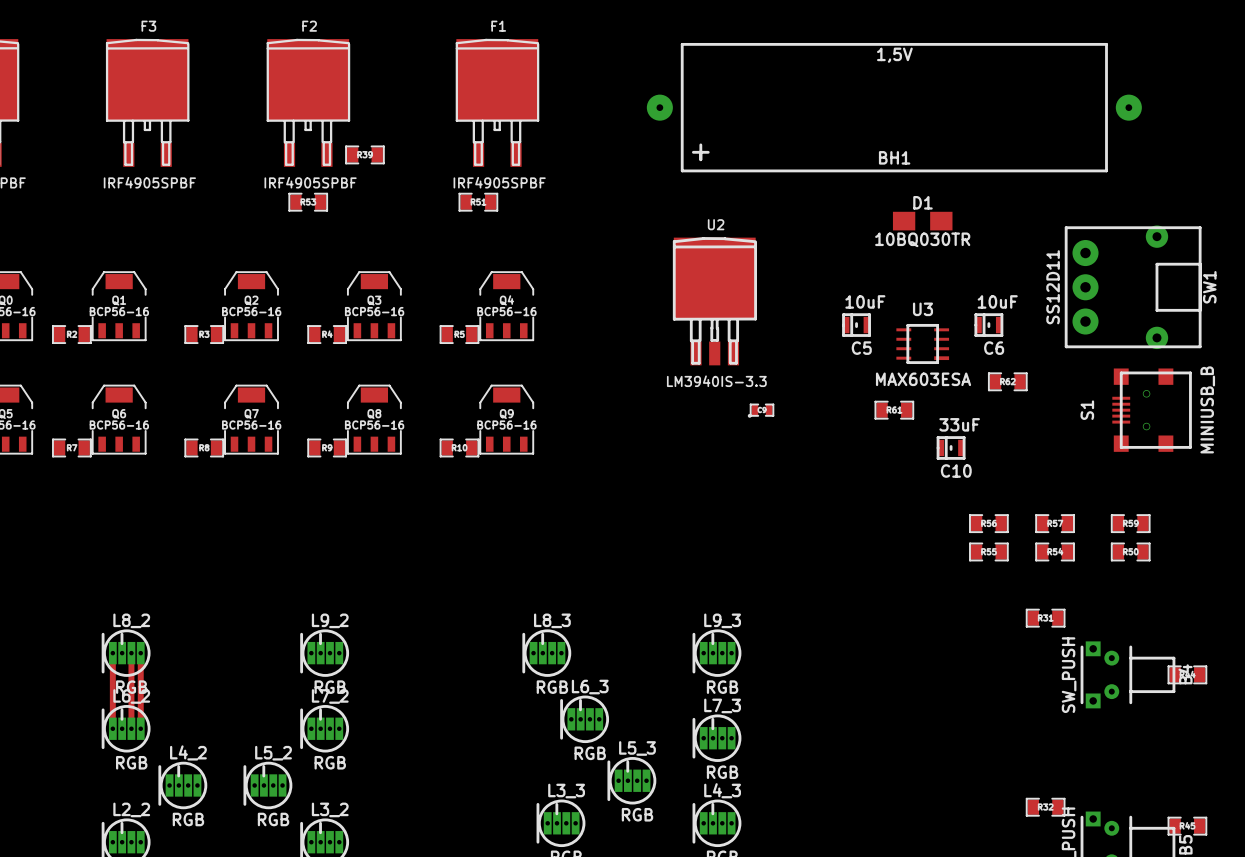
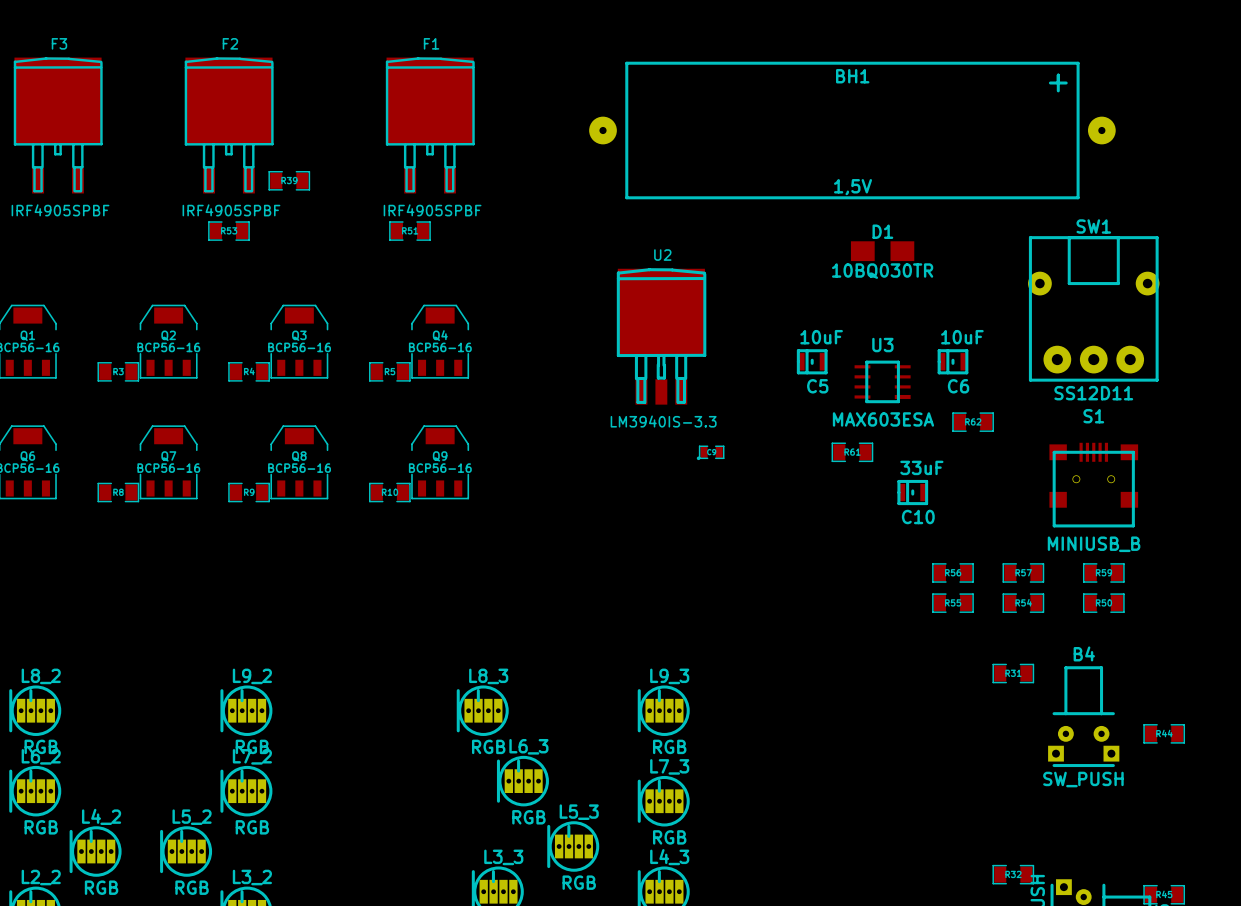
BH1 rotation: 0° (894, 107) -> 180° (852, 130)
SW1 rotation: 0° (1133, 287) -> 90° counterclockwise (1093, 308)
S1 rotation: 0° (1152, 410) -> 90° clockwise (1093, 485)
track: (112, 653) (112, 728) -> none
track: (131, 653) (131, 728) -> none
track: (140, 653) (140, 728) -> none
B4 rotation: 0° (1127, 674) -> 90° counterclockwise (1083, 716)

